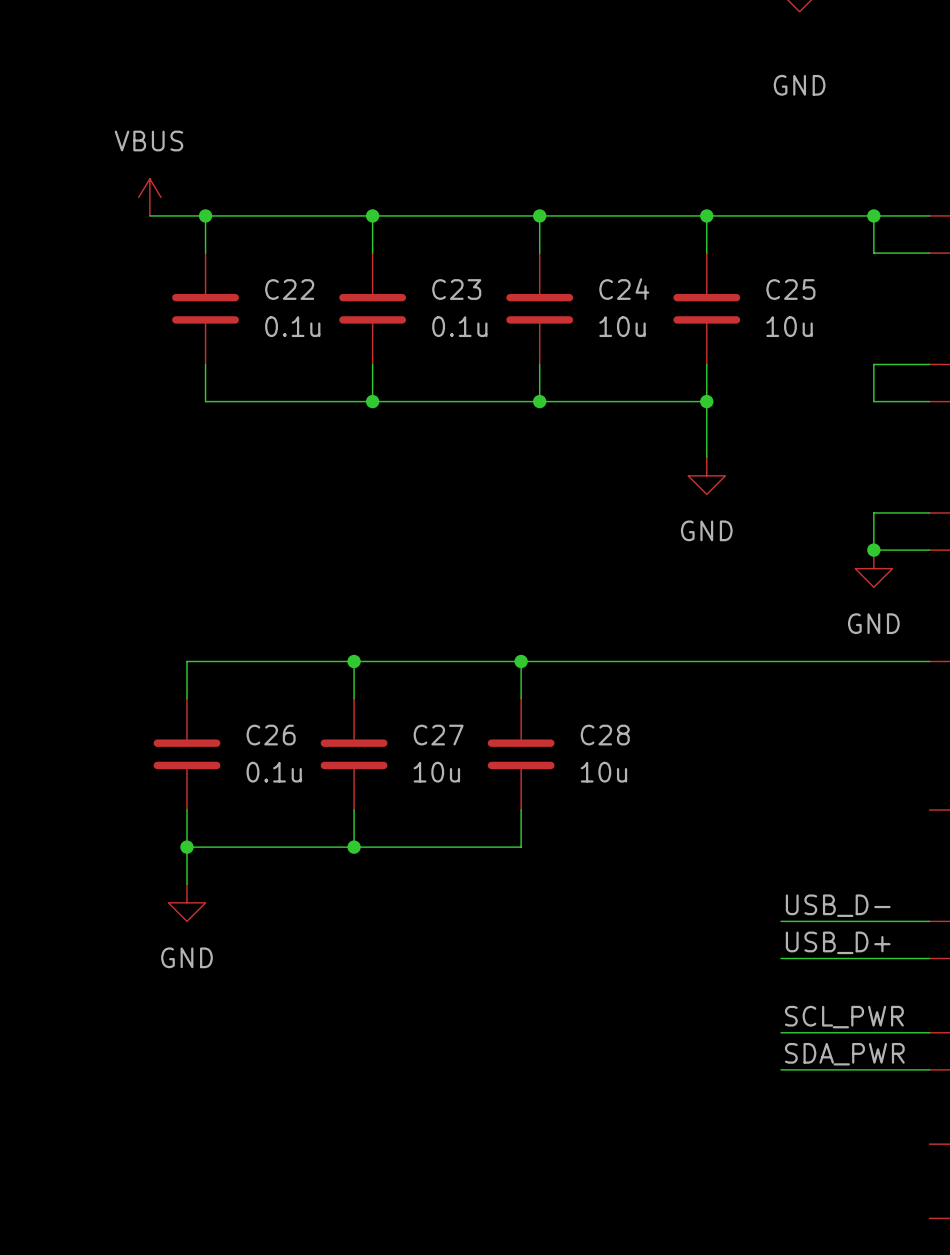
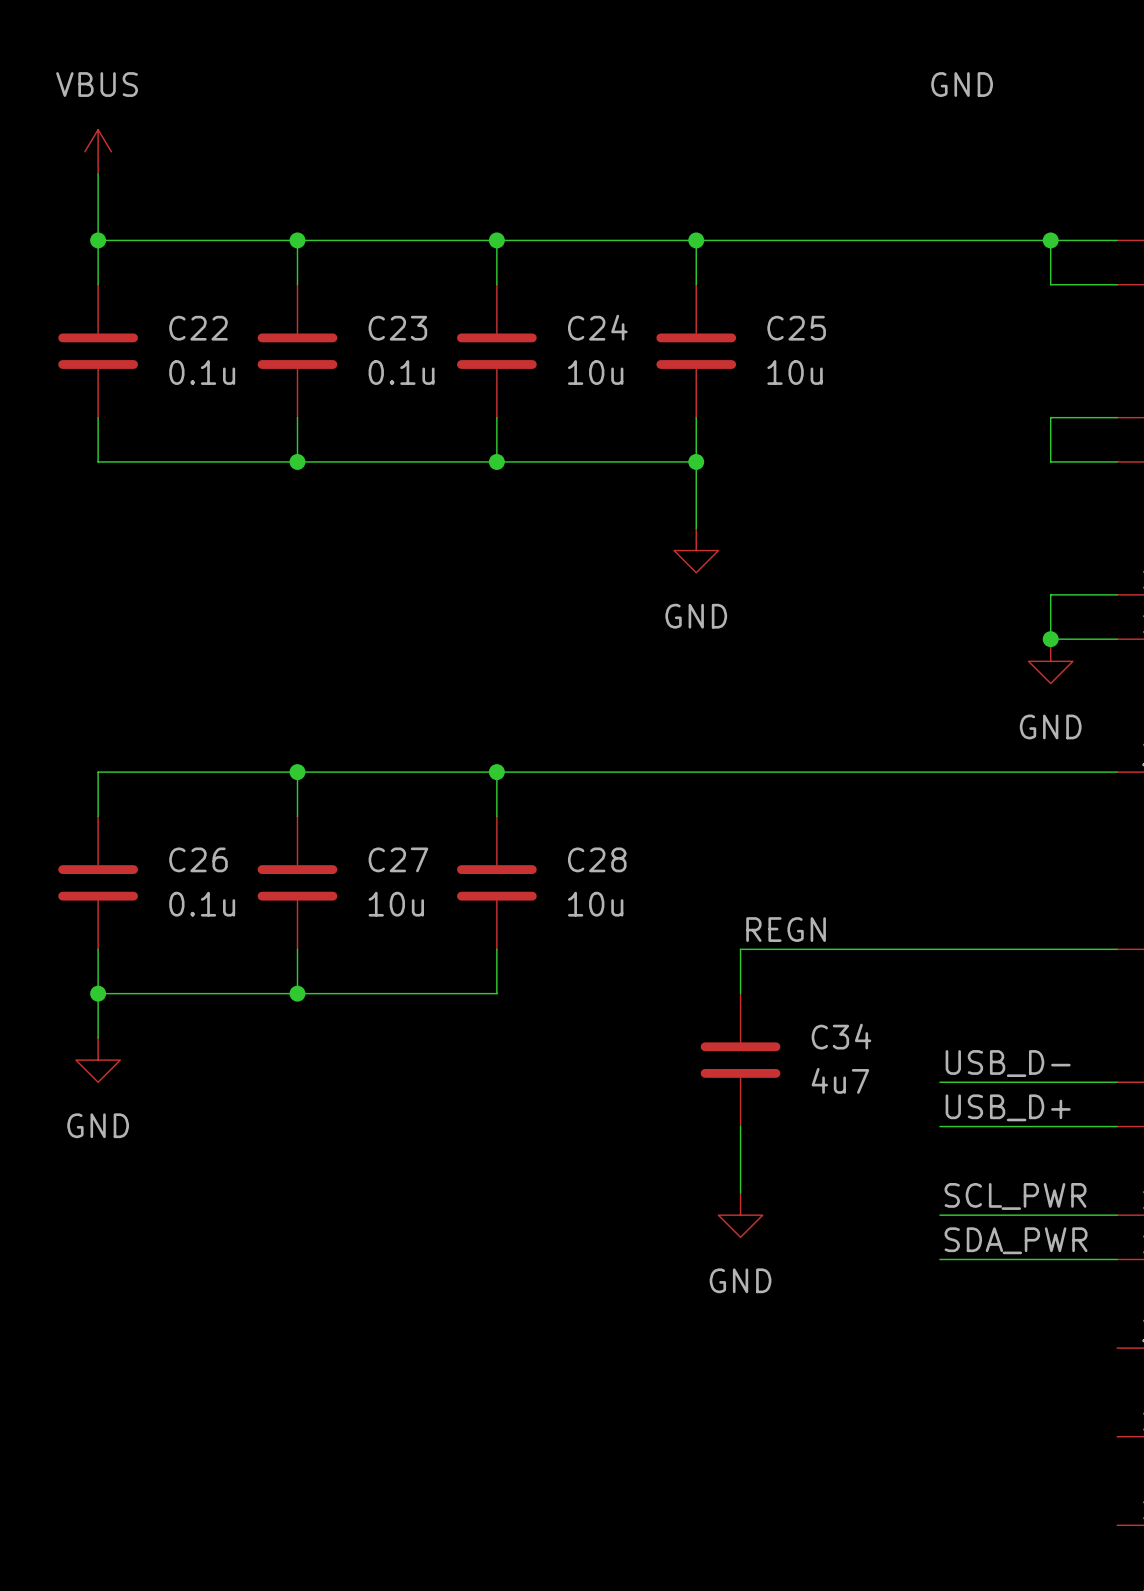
wire: none -> (98, 173) (98, 284)
power symbol position: VBUS (149, 197) -> VBUS (98, 151)
wire: none -> (98, 240) (186, 240)
junction: none -> (98, 240)
wire: (205, 215) (205, 253) -> none
junction position: (205, 215) -> (297, 240)
wire: (372, 215) (372, 253) -> (297, 240) (297, 284)
junction position: (372, 215) -> (496, 240)
wire: (539, 215) (539, 253) -> (496, 240) (496, 284)
junction position: (539, 215) -> (696, 240)
wire: (706, 215) (706, 253) -> (696, 240) (696, 284)
junction: (706, 215) -> none
C22 position: (205, 308) -> (98, 351)
C23 position: (372, 308) -> (297, 351)
C24 position: (539, 308) -> (496, 351)
C25 position: (706, 308) -> (696, 351)
wire: (205, 364) (205, 401) -> (98, 417) (98, 461) (253, 461)
wire: (372, 364) (372, 401) -> (297, 417) (297, 461)
wire: (539, 364) (539, 401) -> (496, 417) (496, 461)
wire: (706, 364) (706, 457) -> (696, 417) (696, 528)
junction: none -> (297, 461)
junction position: (372, 401) -> (496, 461)
junction position: (539, 401) -> (696, 461)
wire: (576, 401) (706, 401) -> none
junction: (706, 401) -> none
power symbol position: GND (706, 475) -> GND (696, 550)
wire: (186, 661) (186, 698) -> (231, 772) (98, 772) (98, 816)
junction: none -> (297, 772)
wire: (354, 661) (354, 698) -> (297, 772) (297, 816)
junction: (354, 661) -> none
junction: none -> (496, 772)
wire: (521, 661) (521, 698) -> (496, 772) (496, 816)
junction: (521, 661) -> none
C26 position: (186, 754) -> (98, 882)
C27 position: (354, 754) -> (297, 882)
C28 position: (521, 754) -> (496, 882)
label: none -> REGN (786, 929)
wire: (186, 810) (186, 884) -> (98, 949) (98, 1037)
wire: (354, 810) (354, 847) -> (297, 949) (297, 993)
wire: (521, 810) (521, 847) (409, 847) -> (496, 949) (496, 993)
wire: none -> (1117, 949) (740, 949) (740, 993)
wire: none -> (98, 993) (231, 993)
junction: none -> (98, 993)
junction: (186, 847) -> none
junction: none -> (297, 993)
junction: (354, 847) -> none
power symbol position: GND (186, 902) -> GND (98, 1060)
C34: none -> 4u7 (740, 1060)
wire: none -> (740, 1126) (740, 1193)
power symbol: none -> GND (740, 1215)

